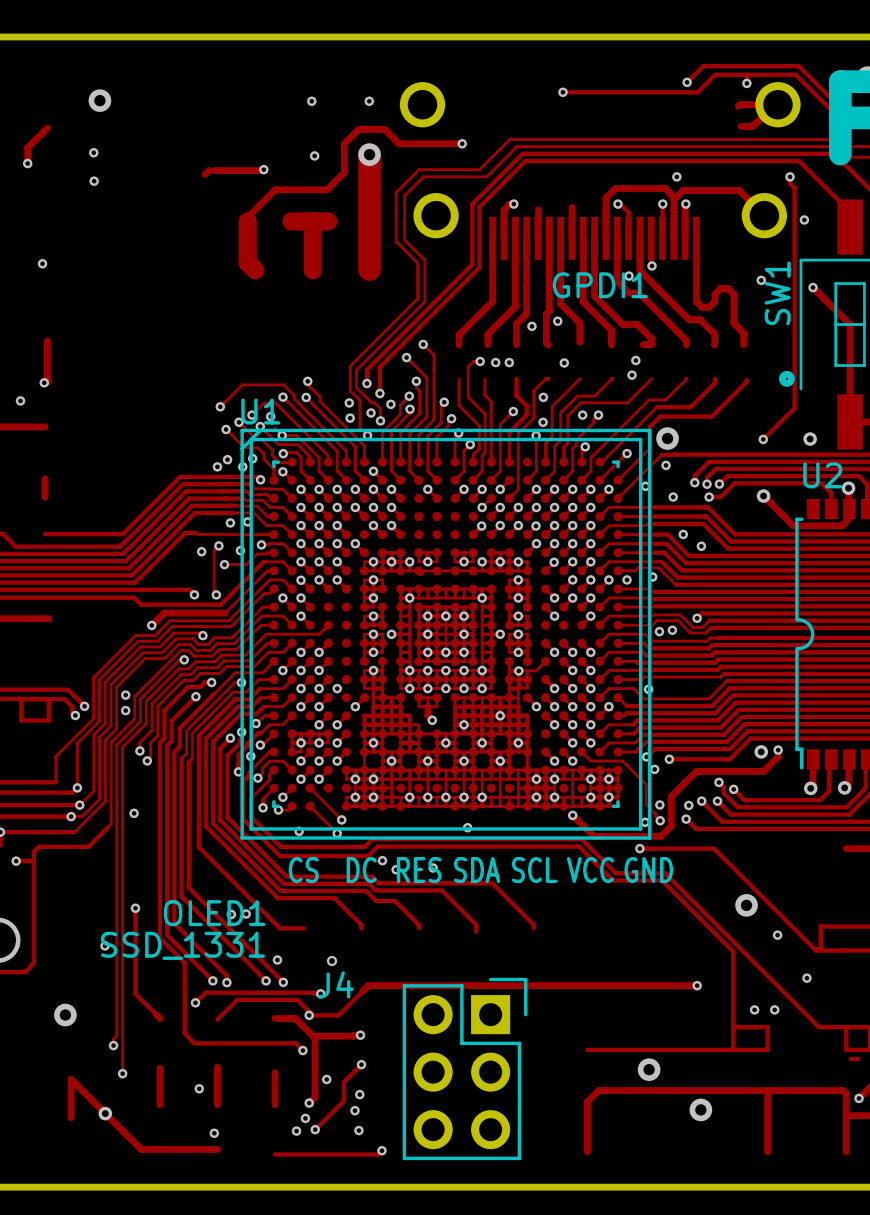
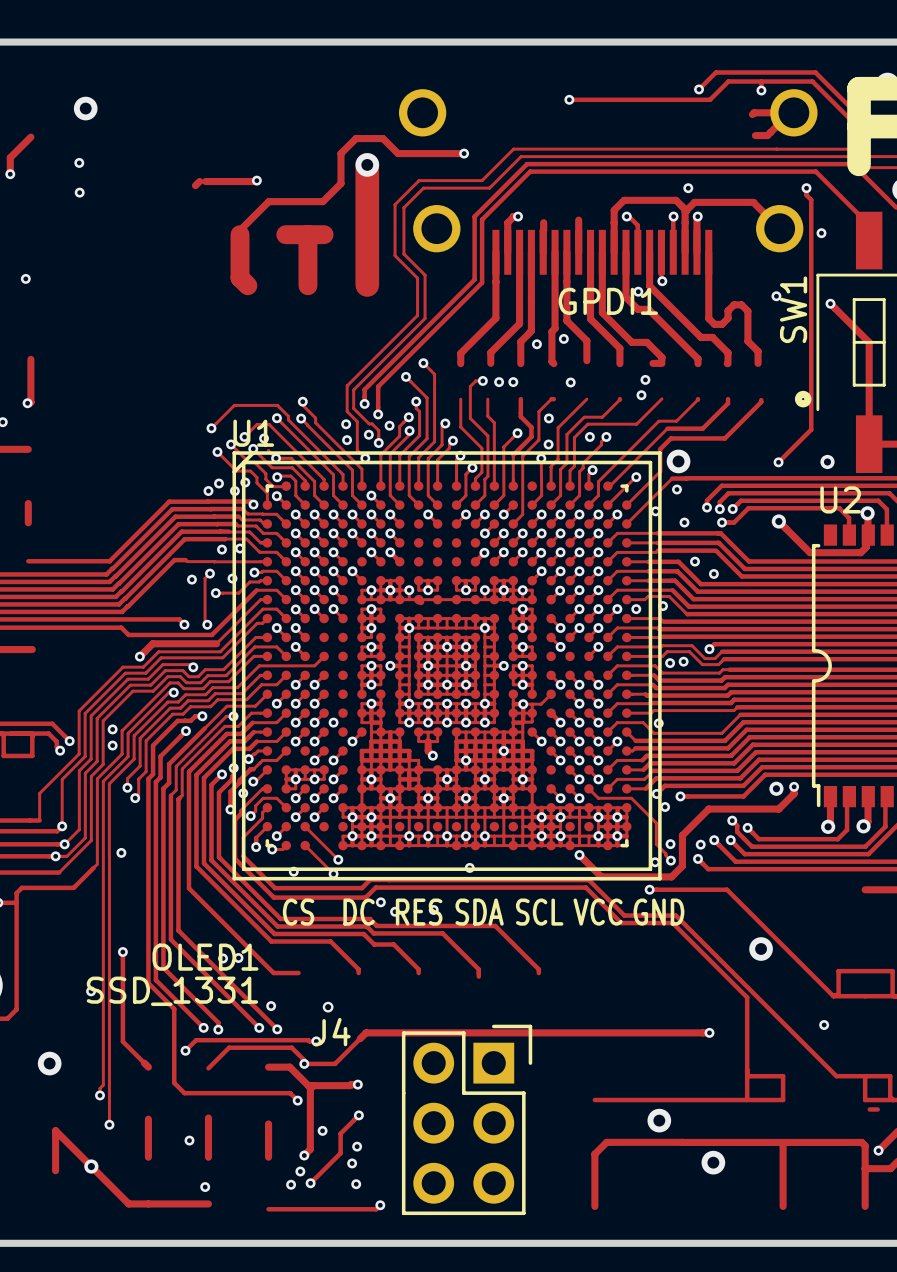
via: (311, 101) -> none
via: (369, 101) -> none
via: (314, 155) -> none
via: (777, 935) -> none
via: (754, 1009) -> none
via: (774, 1009) -> none

